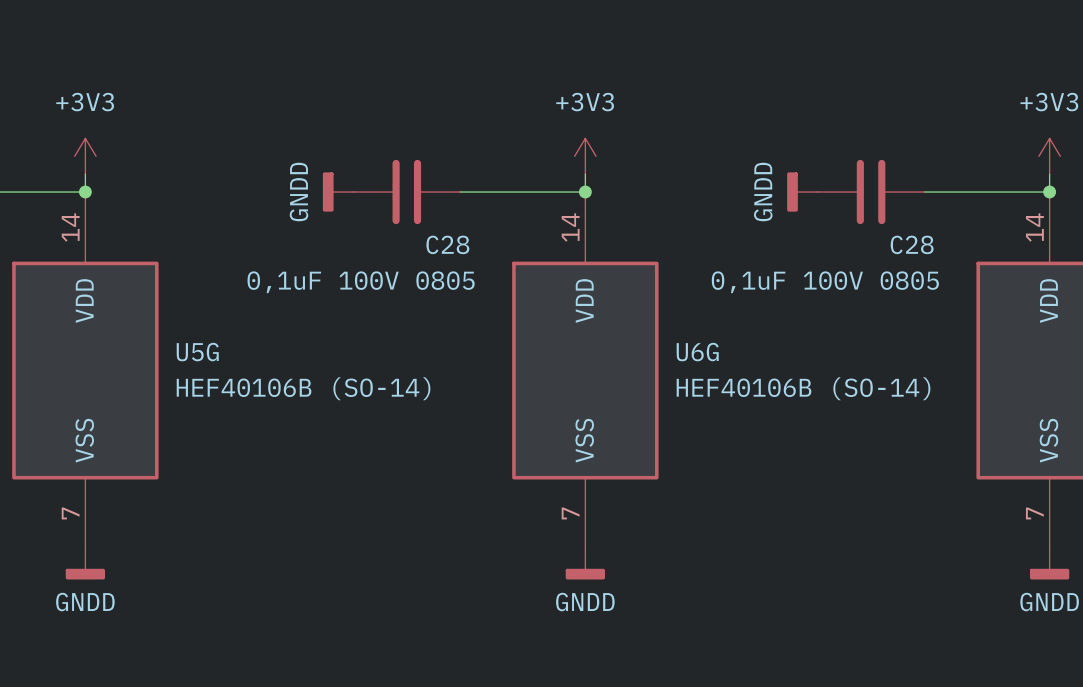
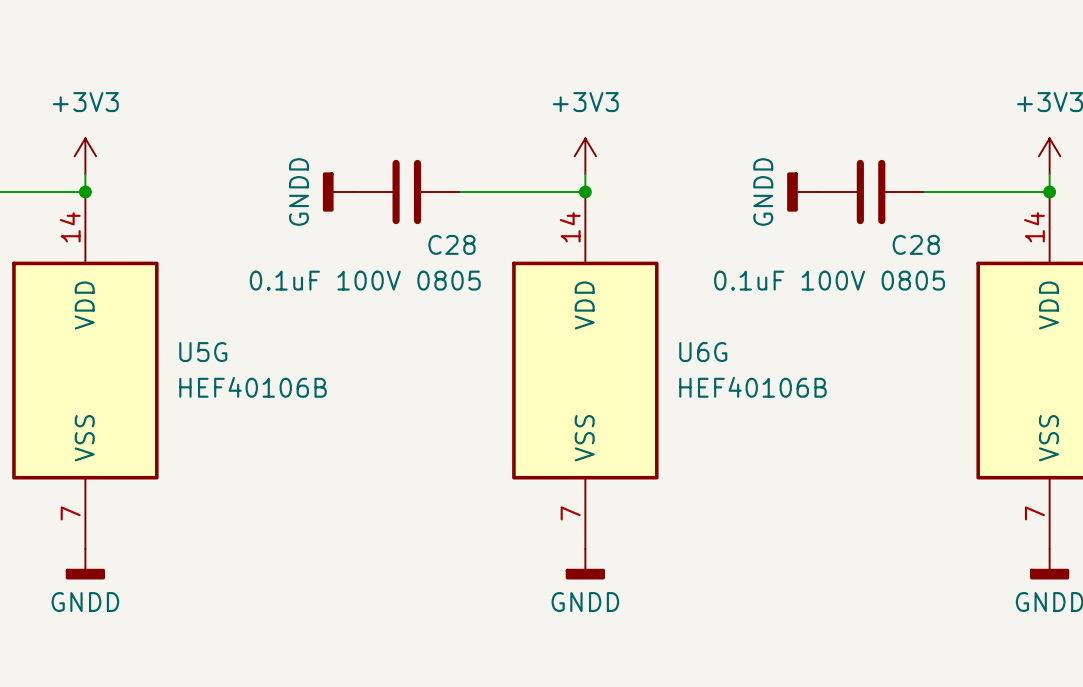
C28 value: 0,1uF 100V 0805 (361, 282) -> 0.1uF 100V 0805 (365, 280)
C28 value: 0,1uF 100V 0805 (825, 282) -> 0.1uF 100V 0805 (829, 280)
U5G value: HEF40106B (SO-14) (303, 388) -> HEF40106B (253, 387)
U6G value: HEF40106B (SO-14) (803, 388) -> HEF40106B (753, 387)

